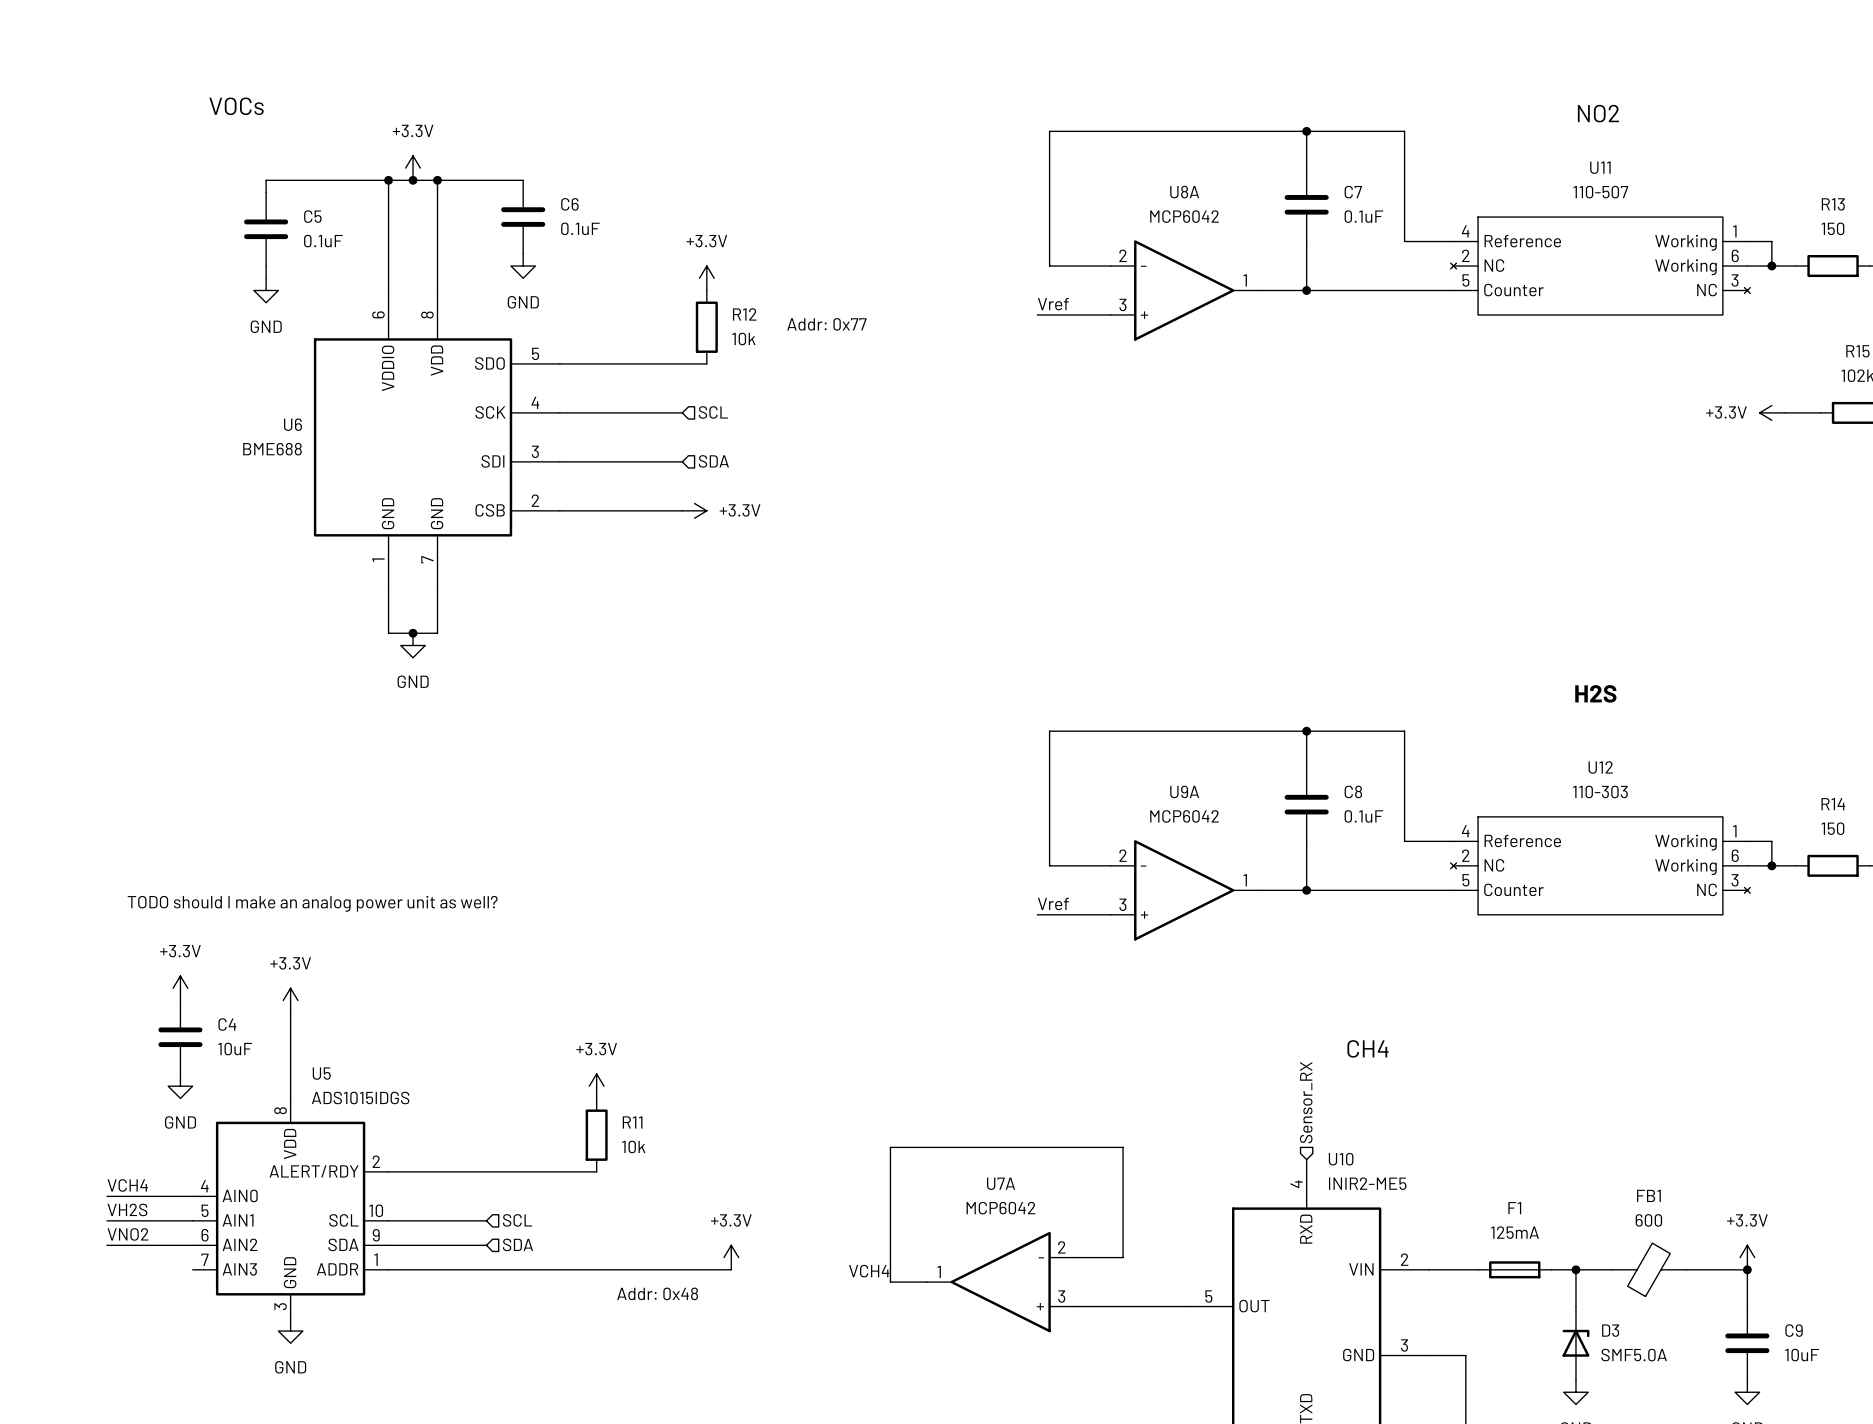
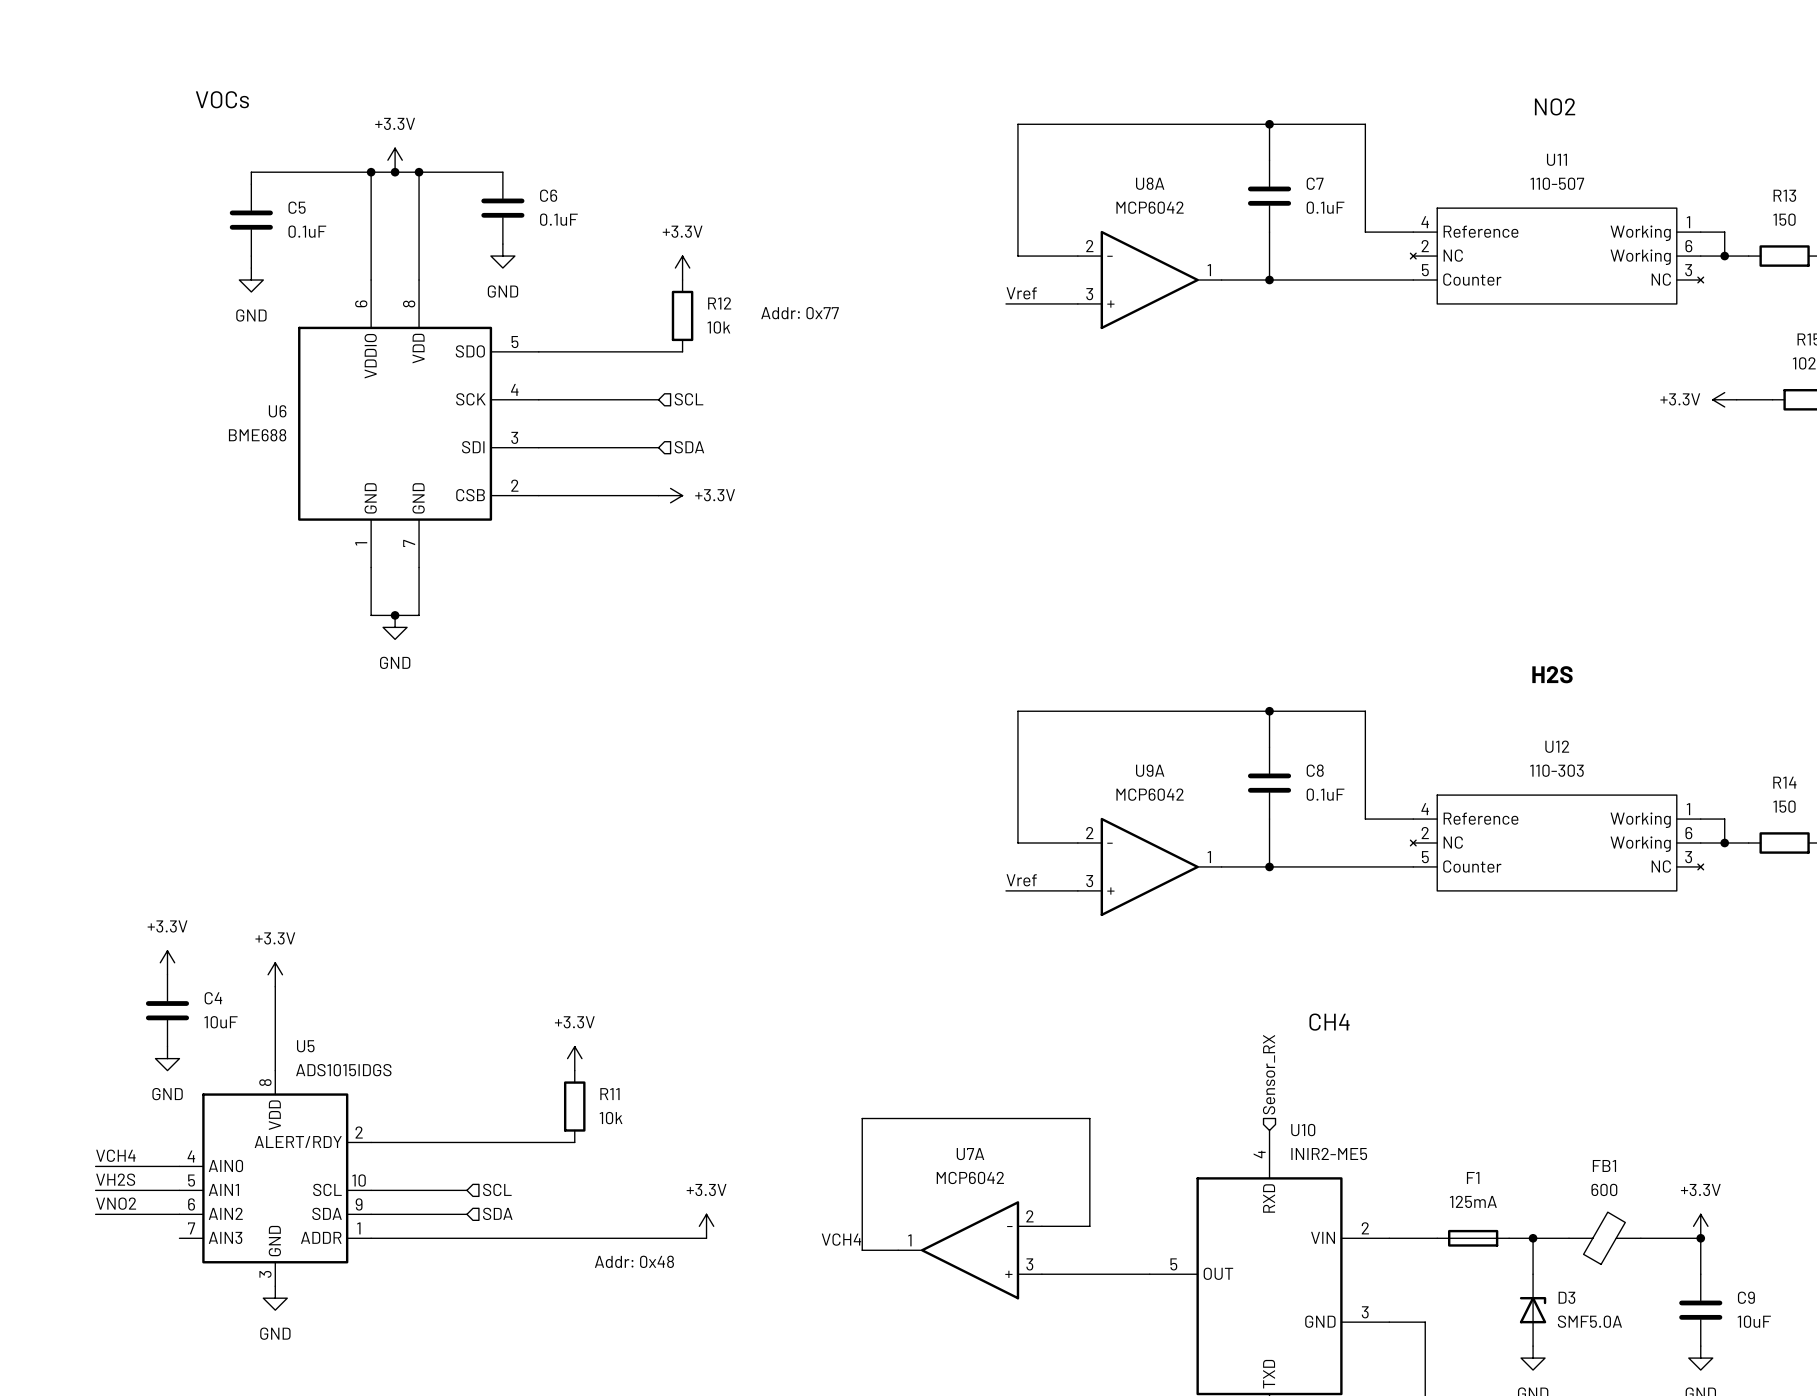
text: TODO should I make an analog power unit as well? (312, 903) -> none

